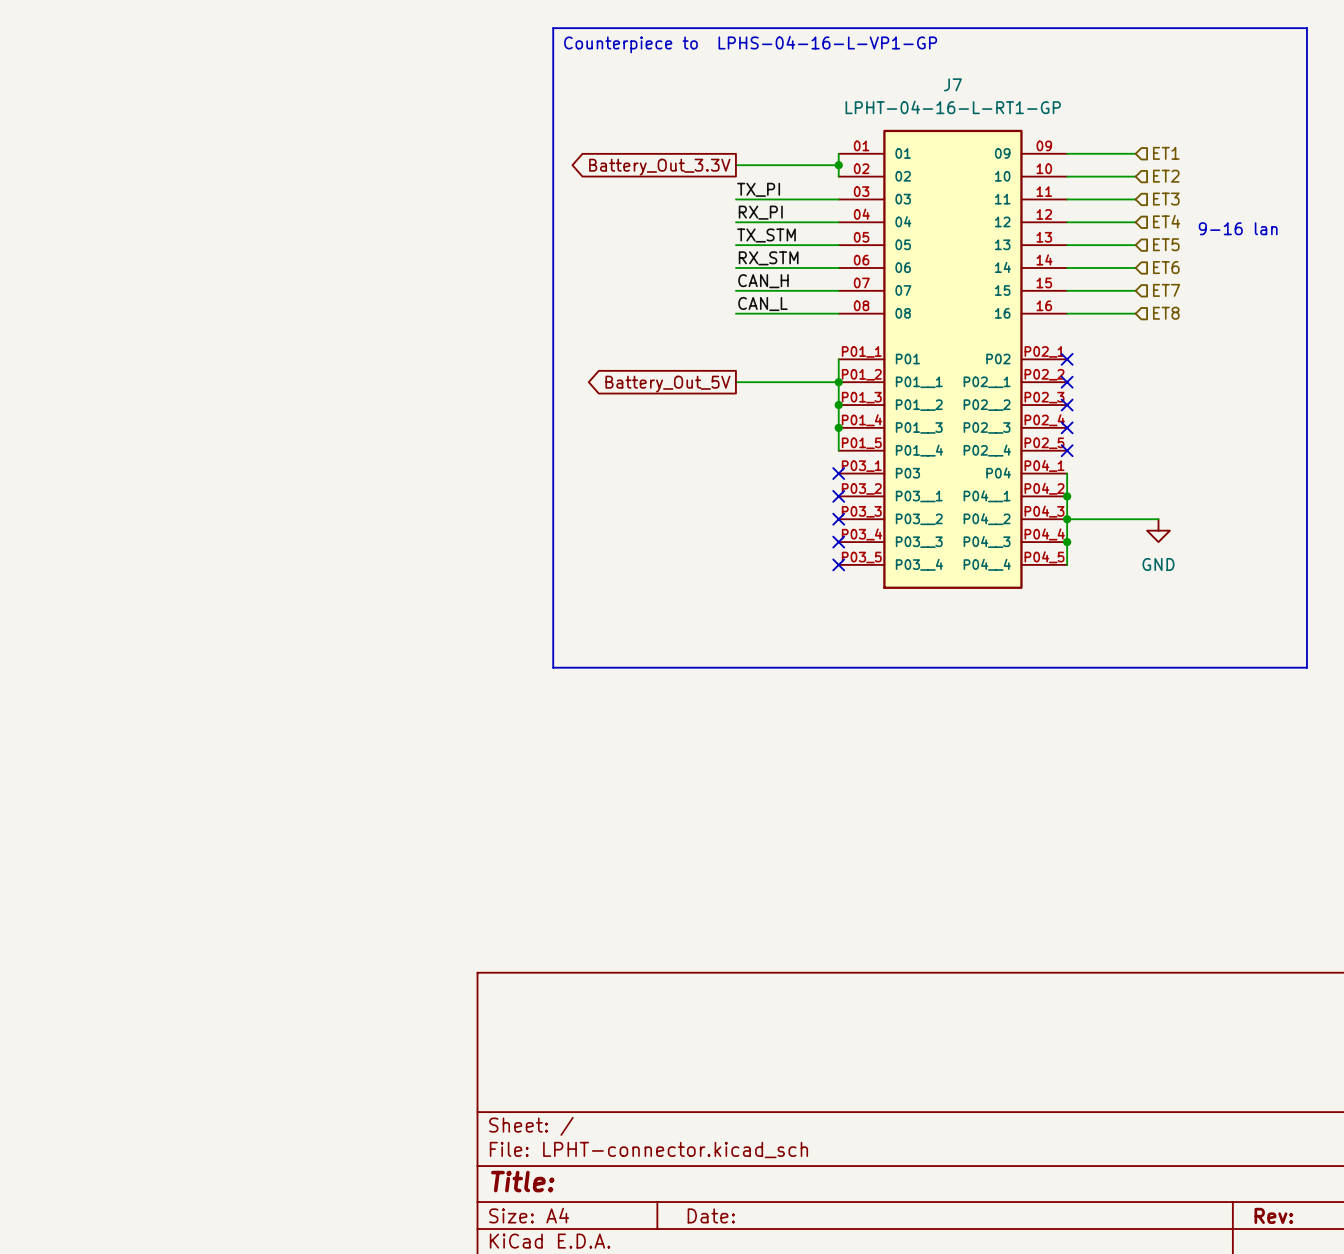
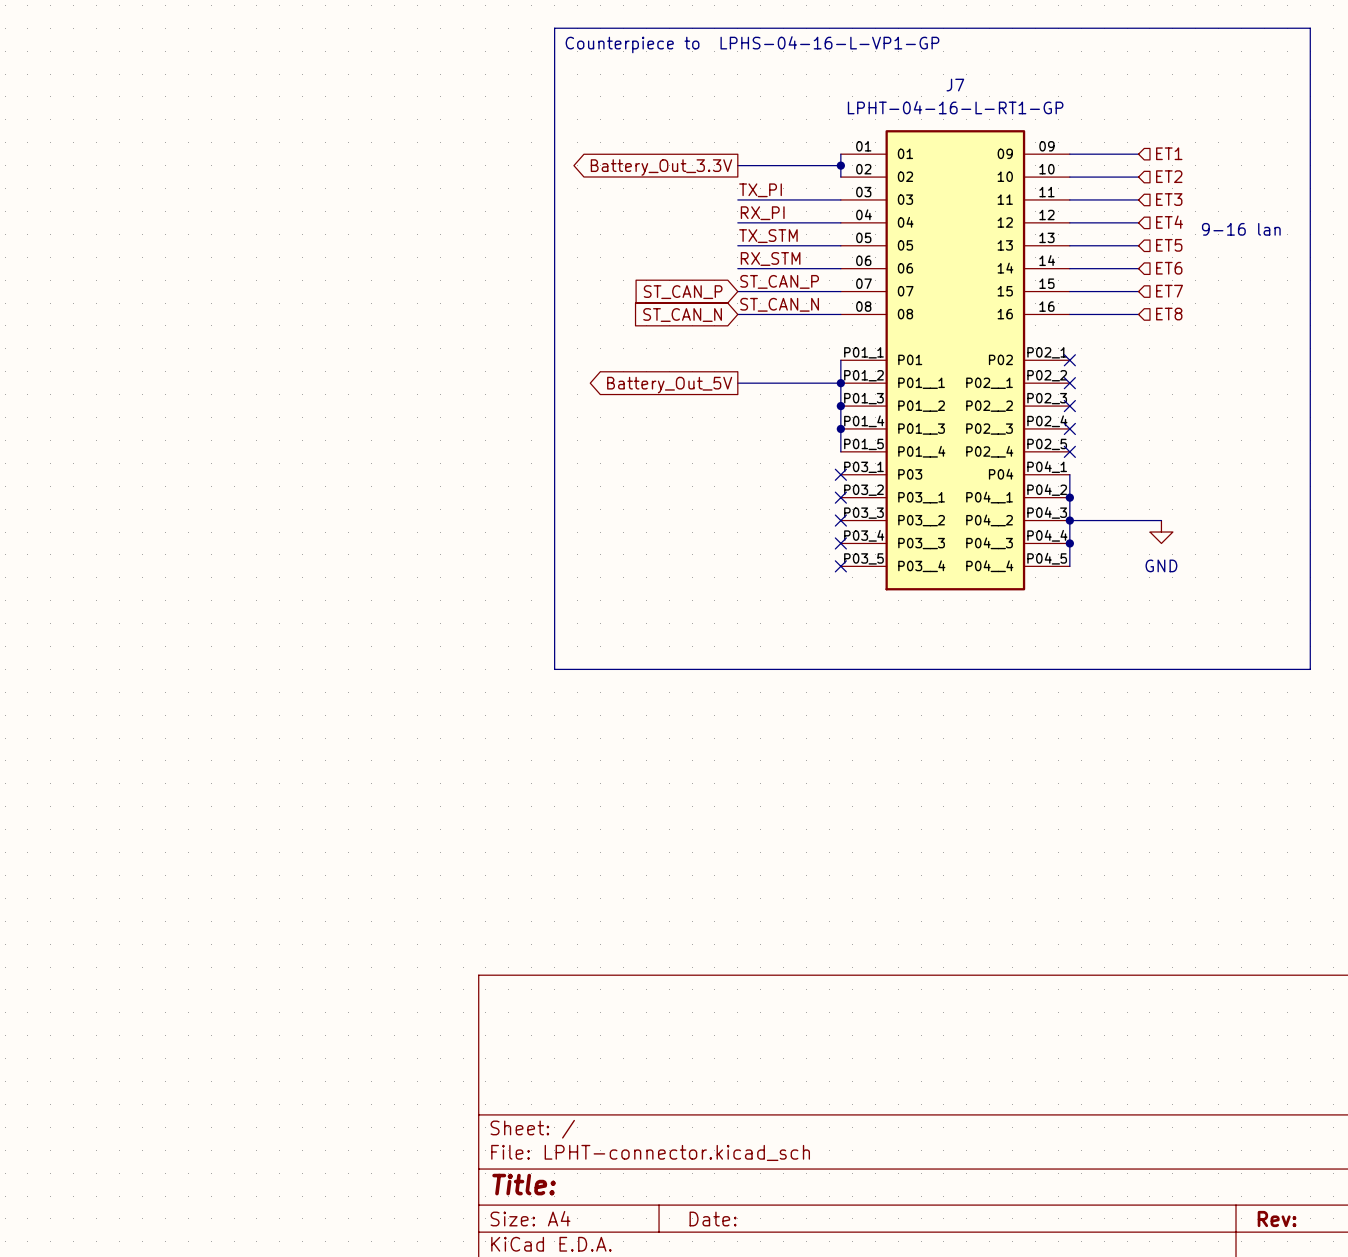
label: CAN_H (763, 281) -> ST_CAN_P (779, 281)
global label: none -> ST_CAN_P (683, 292)
label: CAN_L (762, 304) -> ST_CAN_N (779, 304)
global label: none -> ST_CAN_N (682, 315)

